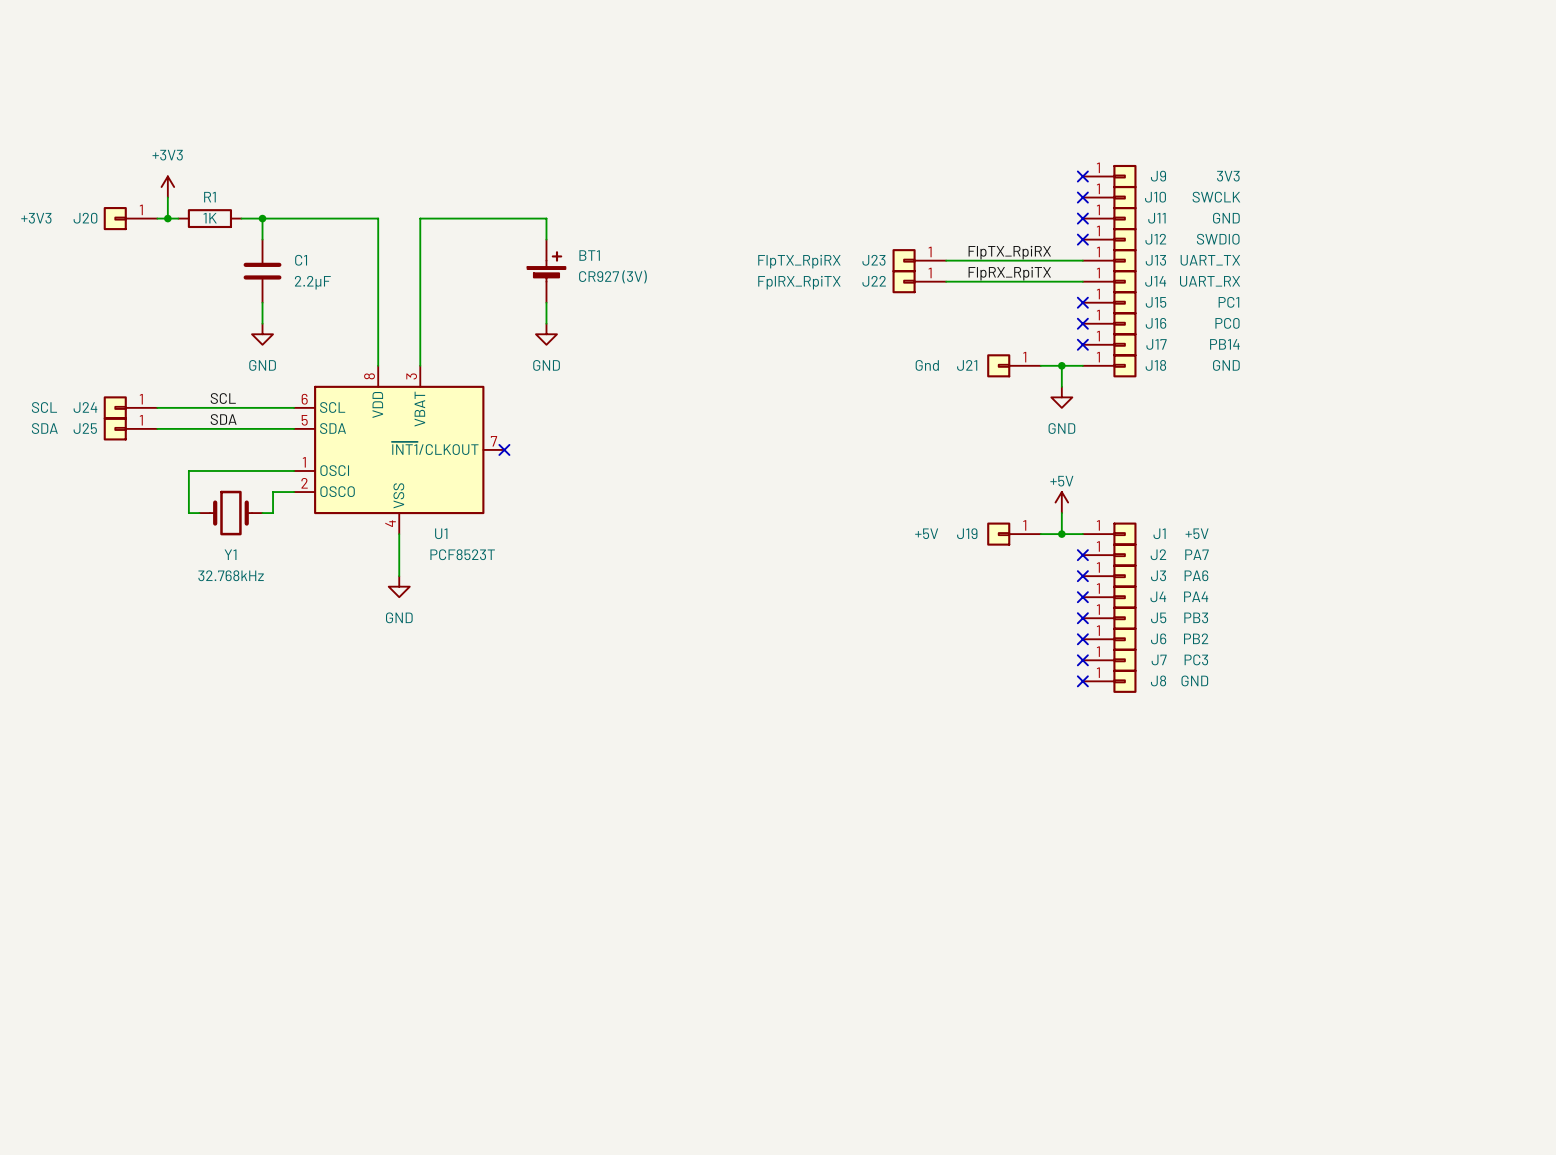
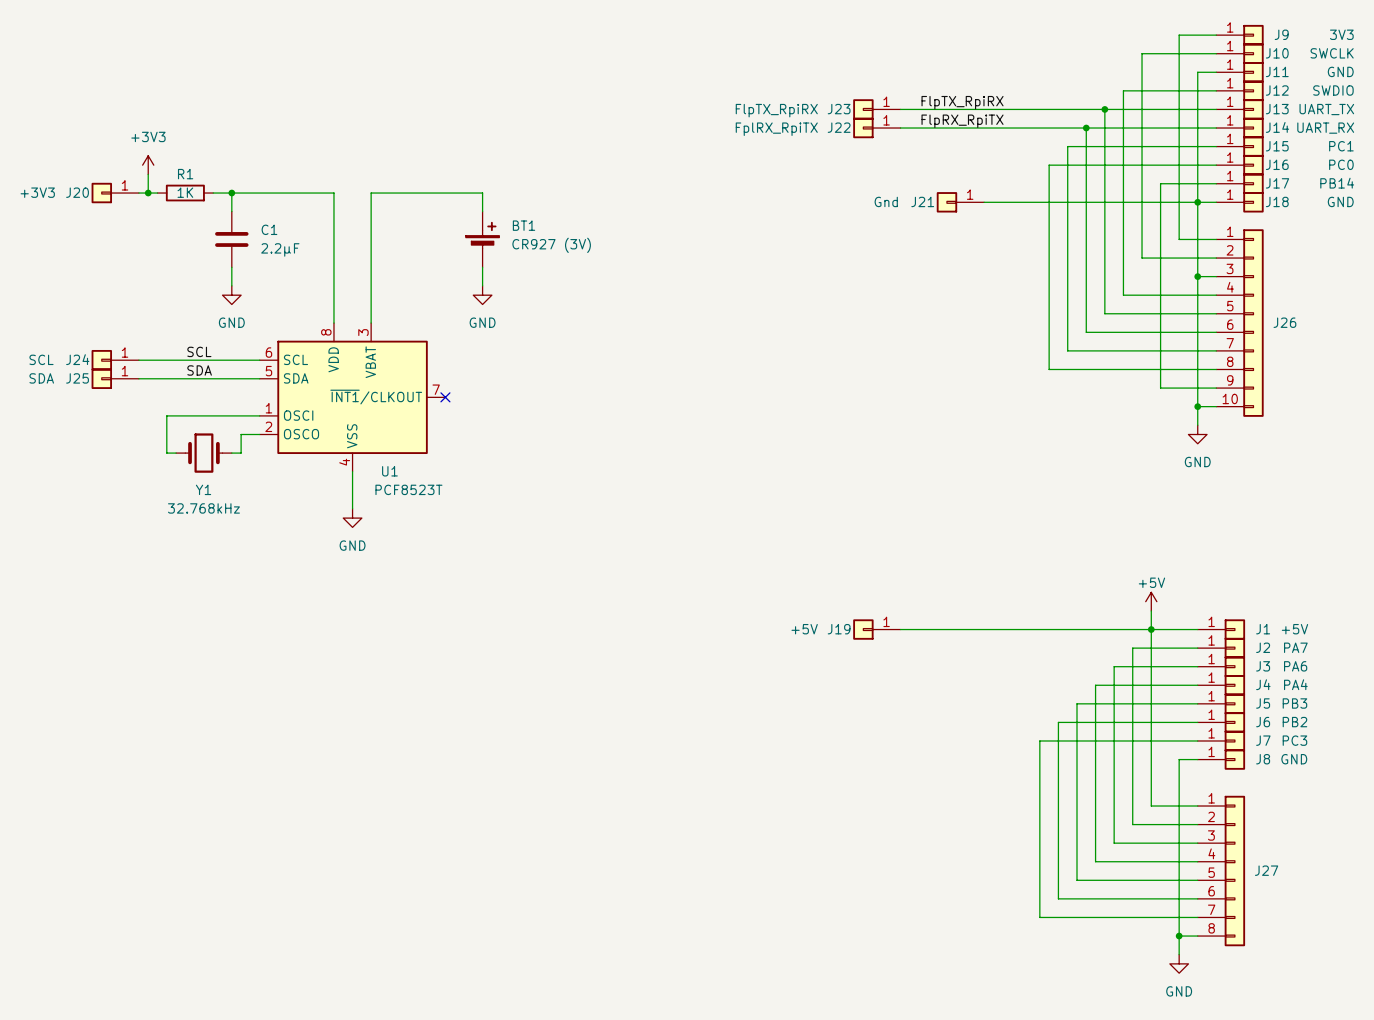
wire: none -> (1216, 35) (1179, 35) (1179, 239) (1216, 239)
wire: none -> (1216, 53) (1142, 53) (1142, 258) (1216, 258)
wire: none -> (1216, 72) (1197, 72) (1197, 425)
wire: none -> (1216, 90) (1123, 90) (1123, 295) (1216, 295)
wire: none -> (900, 109) (1216, 109)
wire: none -> (1104, 109) (1104, 313) (1216, 313)
junction: none -> (1104, 109)
wire: none -> (900, 128) (1216, 128)
wire: none -> (1086, 128) (1086, 332) (1216, 332)
junction: none -> (1086, 128)
wire: none -> (1216, 146) (1067, 146) (1067, 350) (1216, 350)
no-connect mark: (1082, 176) -> none
J9 position: (1109, 176) -> (1239, 35)
wire: none -> (1216, 165) (1049, 165) (1049, 369) (1216, 369)
no-connect mark: (1082, 197) -> none
J10 position: (1109, 197) -> (1239, 53)
wire: none -> (1216, 183) (1160, 183) (1160, 388) (1216, 388)
no-connect mark: (1082, 218) -> none
J11 position: (1109, 218) -> (1239, 72)
wire: none -> (984, 202) (1216, 202)
junction: none -> (1197, 202)
no-connect mark: (1082, 239) -> none
J12 position: (1109, 239) -> (1239, 90)
label position: FlpTX_RpiRX (1009, 252) -> FlpTX_RpiRX (962, 102)
J23 position: (919, 260) -> (876, 109)
wire: (946, 260) (1082, 260) -> none
J13 position: (1109, 260) -> (1239, 109)
label position: FlpRX_RpiTX (1009, 273) -> FlpRX_RpiTX (962, 121)
J22 position: (919, 281) -> (876, 128)
wire: (946, 281) (1082, 281) -> none
J14 position: (1109, 281) -> (1239, 128)
no-connect mark: (1082, 302) -> none
J15 position: (1109, 302) -> (1239, 146)
wire: none -> (1197, 276) (1216, 276)
junction: none -> (1197, 276)
no-connect mark: (1082, 323) -> none
J16 position: (1109, 323) -> (1239, 165)
no-connect mark: (1082, 344) -> none
J17 position: (1109, 344) -> (1239, 183)
J21 position: (1013, 365) -> (960, 202)
wire: (1040, 365) (1082, 365) -> none
wire: (1061, 365) (1061, 386) -> none
junction: (1061, 365) -> none
J18 position: (1109, 365) -> (1239, 202)
J26: none -> (1239, 323)
power symbol: GND (1061, 397) -> none
wire: none -> (1197, 406) (1216, 406)
junction: none -> (1197, 406)
power symbol: none -> GND (1197, 434)
power symbol: +5V (1061, 502) -> none
wire: (1061, 513) (1061, 534) -> none
J19 position: (1013, 534) -> (876, 629)
wire: (1040, 534) (1082, 534) -> none
junction: (1061, 534) -> none
J1 position: (1109, 534) -> (1221, 629)
no-connect mark: (1082, 555) -> none
J2 position: (1109, 555) -> (1221, 648)
no-connect mark: (1082, 576) -> none
J3 position: (1109, 576) -> (1221, 666)
no-connect mark: (1082, 597) -> none
J4 position: (1109, 597) -> (1221, 685)
no-connect mark: (1082, 618) -> none
J5 position: (1109, 618) -> (1221, 703)
no-connect mark: (1082, 639) -> none
J6 position: (1109, 639) -> (1221, 722)
no-connect mark: (1082, 660) -> none
J7 position: (1109, 660) -> (1221, 740)
no-connect mark: (1082, 681) -> none
J8 position: (1109, 681) -> (1221, 759)
power symbol: none -> +5V (1151, 601)
wire: none -> (1151, 610) (1151, 806) (1197, 806)
wire: none -> (900, 629) (1197, 629)
junction: none -> (1151, 629)
wire: none -> (1197, 648) (1132, 648) (1132, 824) (1197, 824)
wire: none -> (1197, 666) (1114, 666) (1114, 843) (1197, 843)
wire: none -> (1197, 685) (1095, 685) (1095, 861) (1197, 861)
wire: none -> (1197, 703) (1076, 703) (1076, 880) (1197, 880)
wire: none -> (1197, 722) (1058, 722) (1058, 898) (1197, 898)
wire: none -> (1197, 740) (1039, 740) (1039, 917) (1197, 917)
wire: none -> (1197, 759) (1179, 759) (1179, 954)
J27: none -> (1221, 871)
wire: none -> (1179, 936) (1197, 936)
junction: none -> (1179, 936)
power symbol: none -> GND (1179, 963)

